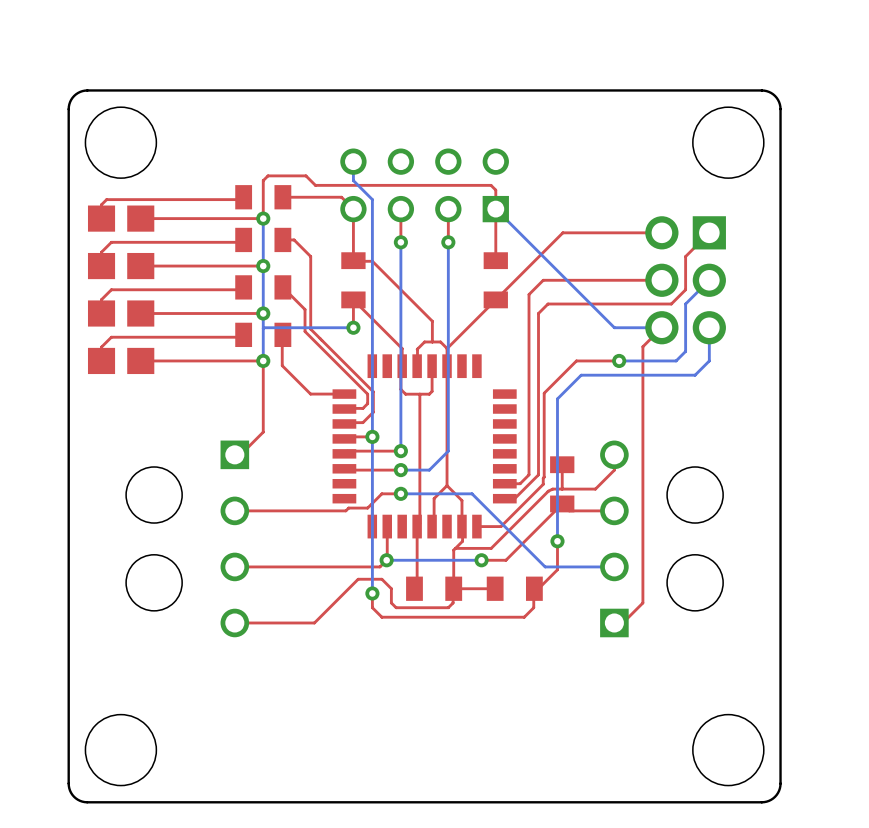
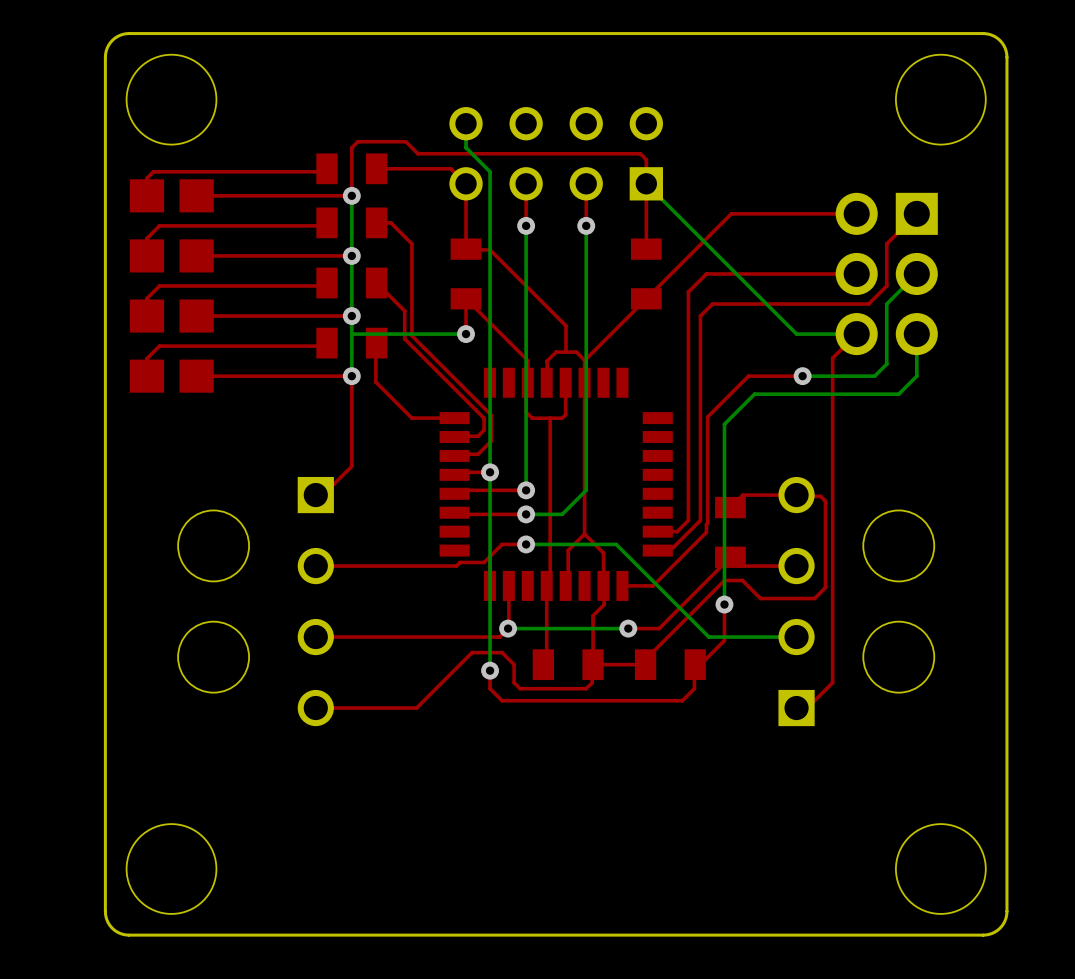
top track: none -> (784, 495) (820, 496) (825, 501) (825, 587) (814, 598) (760, 598) (742, 580) (724, 580) (645, 659) (645, 664)
top track: (614, 454) (614, 470) (595, 489) (552, 489) (548, 491) -> (796, 495) (743, 495) (730, 507)
top track: (562, 464) (562, 489) -> none
top track: (548, 491) (491, 548) (455, 548) -> none

